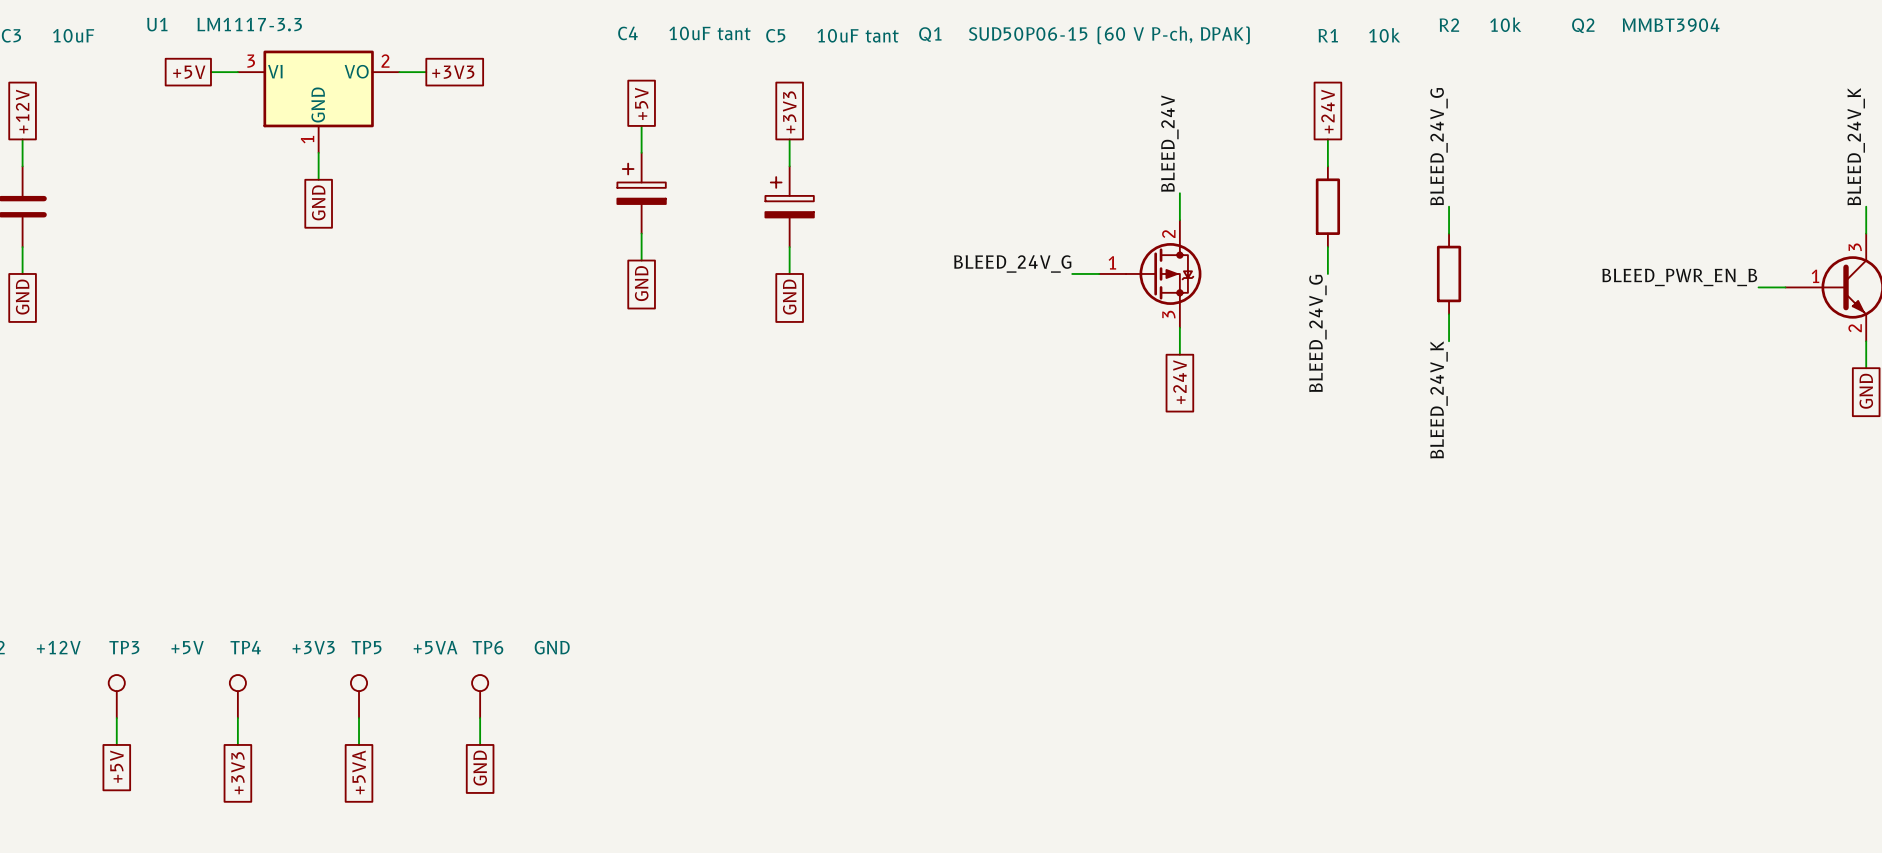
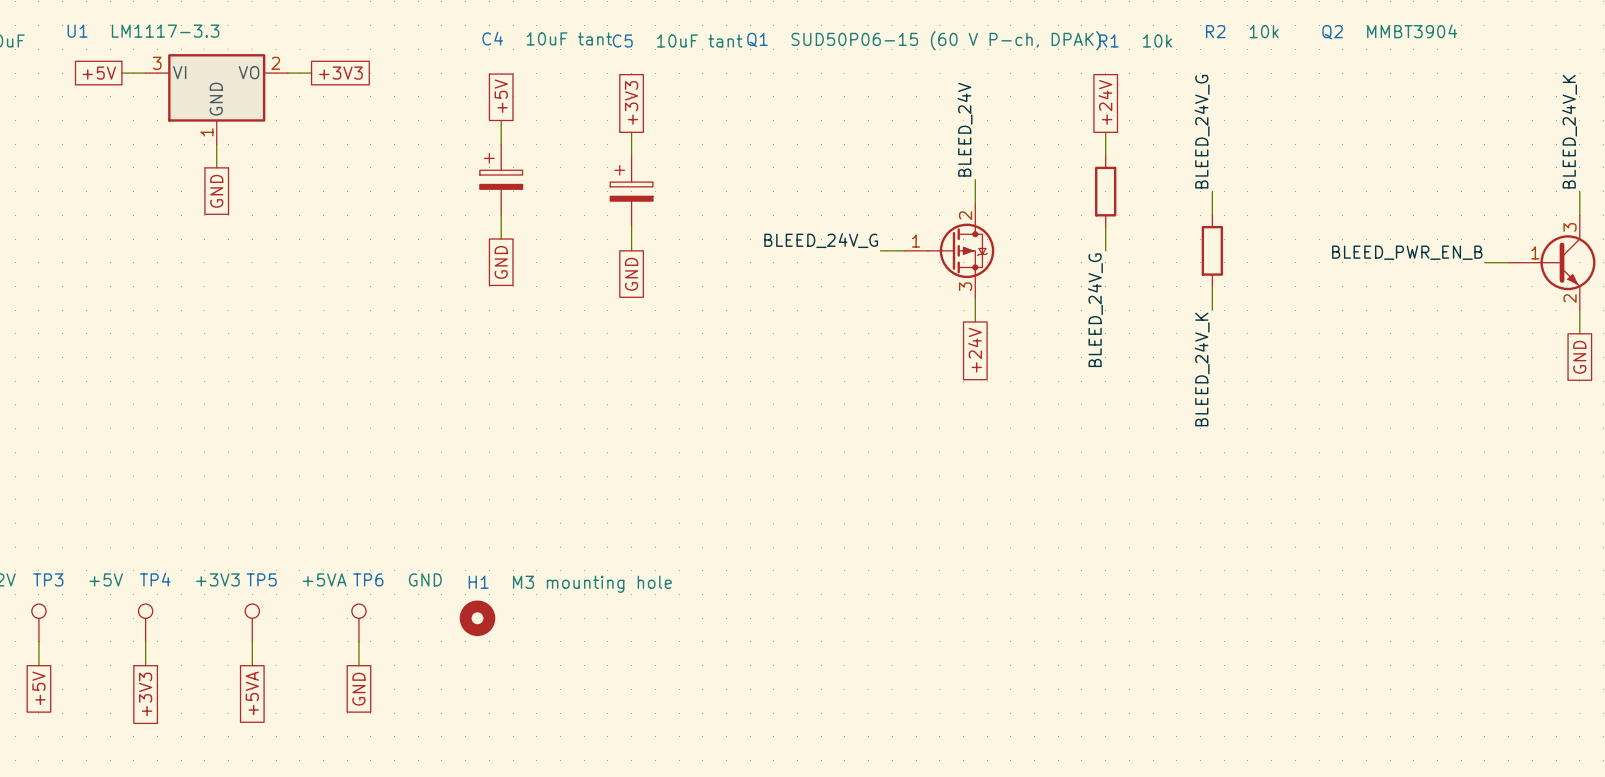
H1: none -> M3 mounting hole (477, 618)

